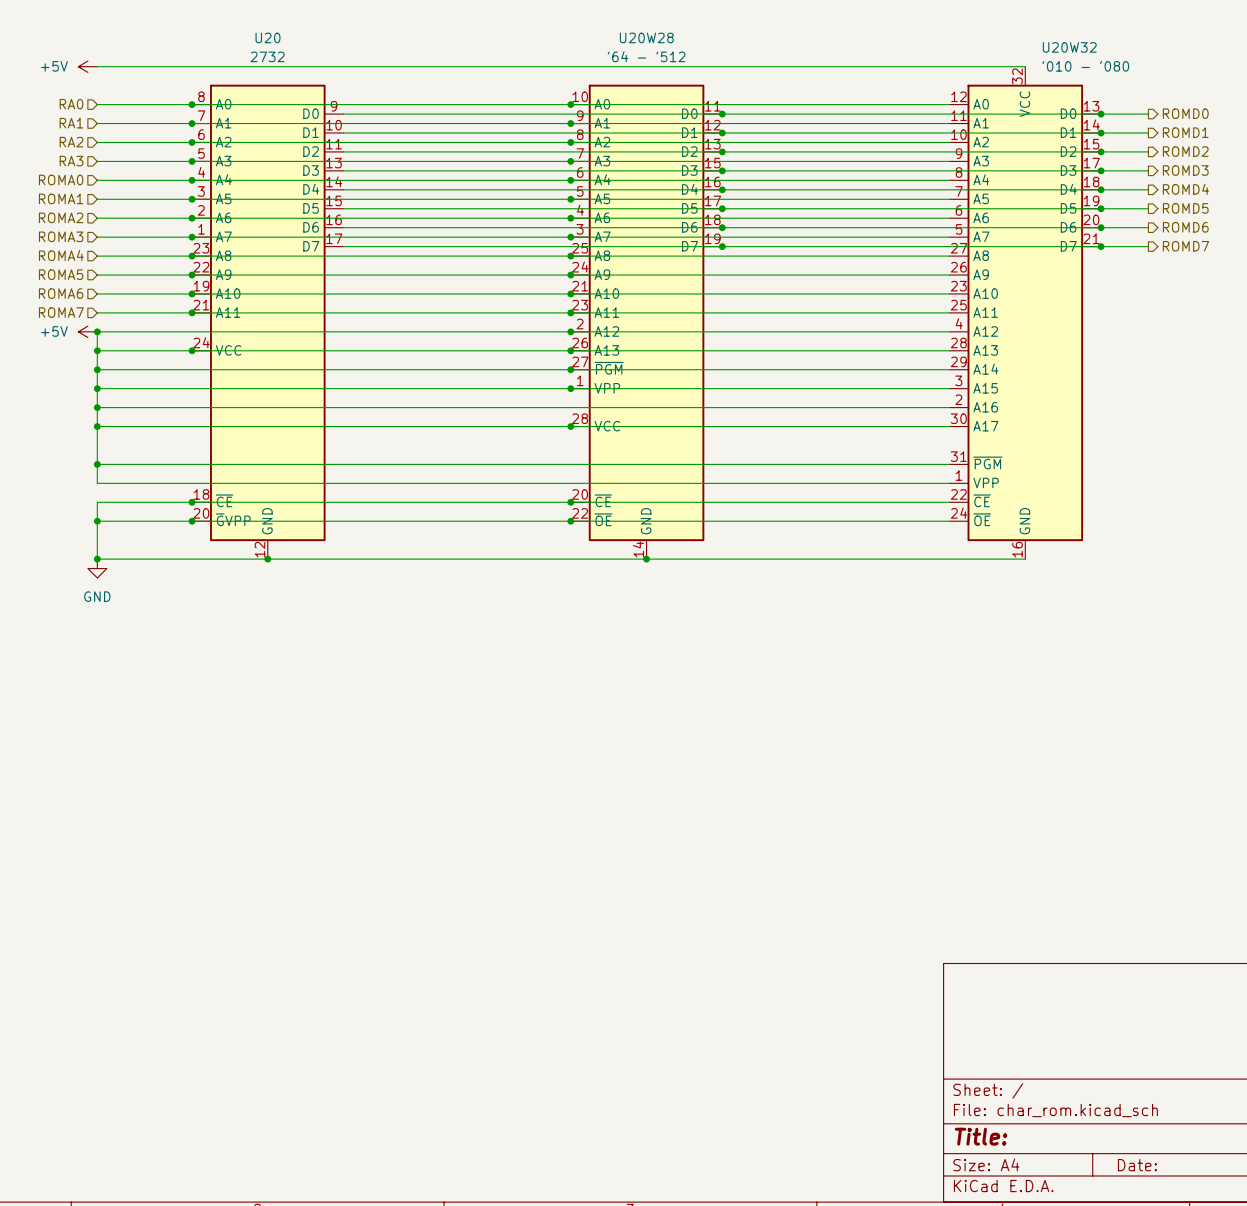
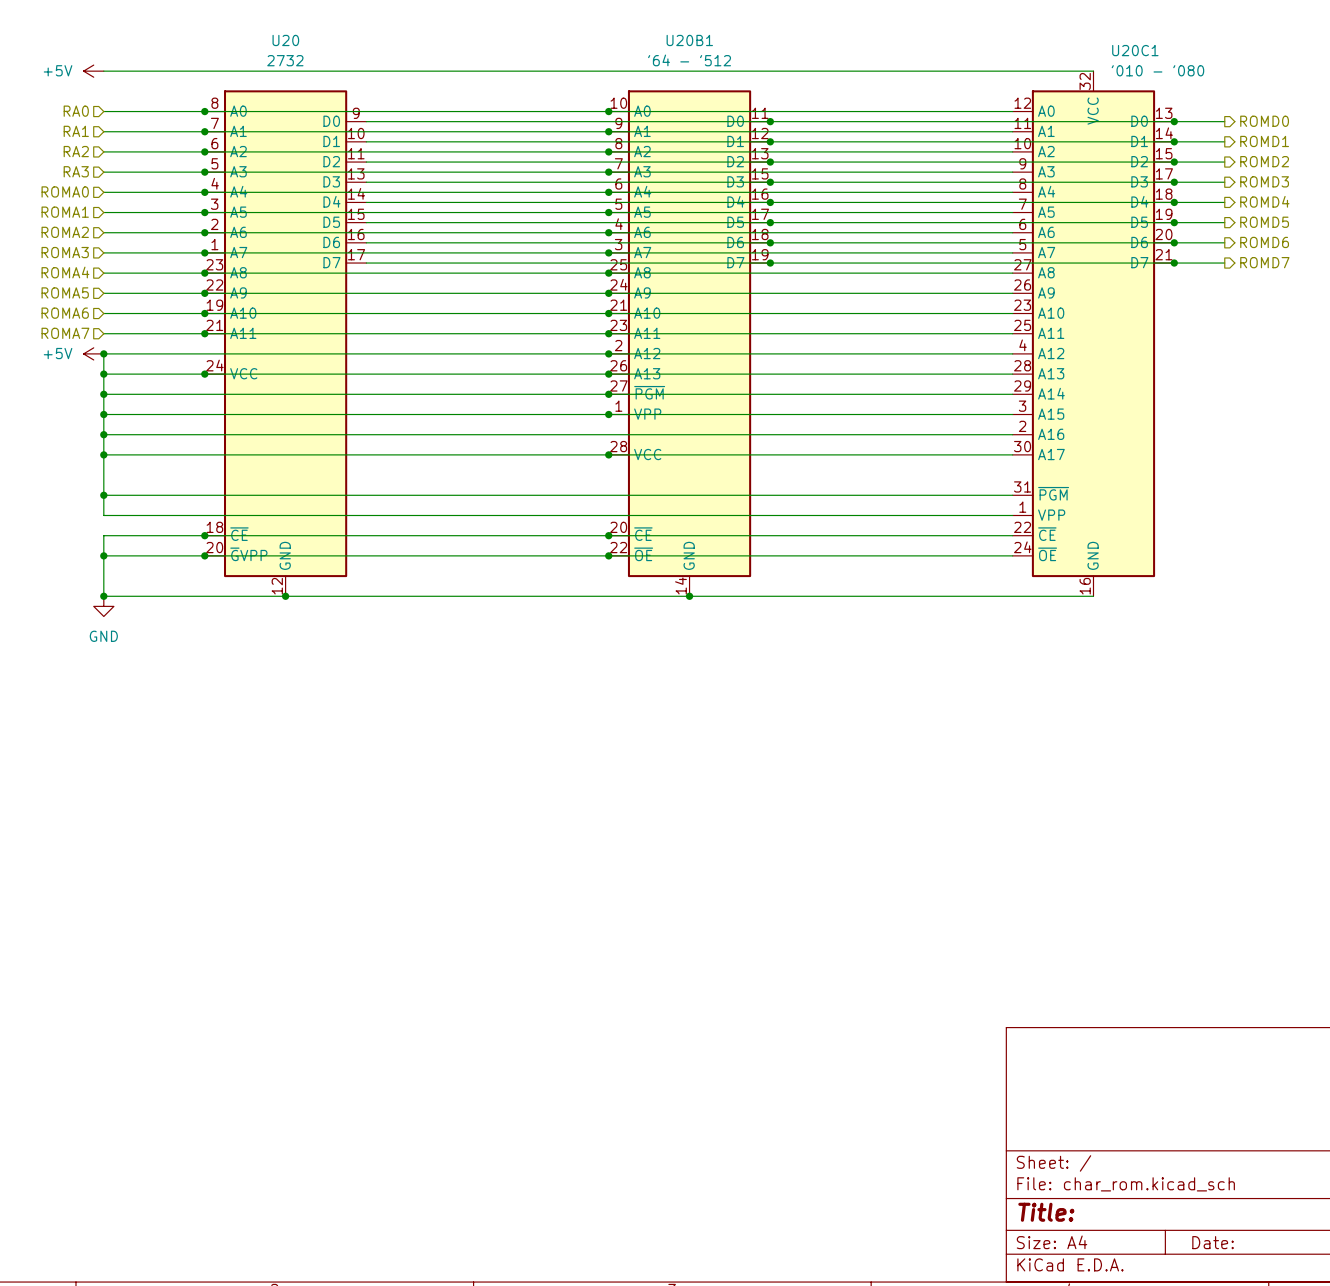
U20W28 name: U20W28 (646, 37) -> U20B1 (689, 40)
U20W32 name: U20W32 (1069, 47) -> U20C1 (1135, 50)

